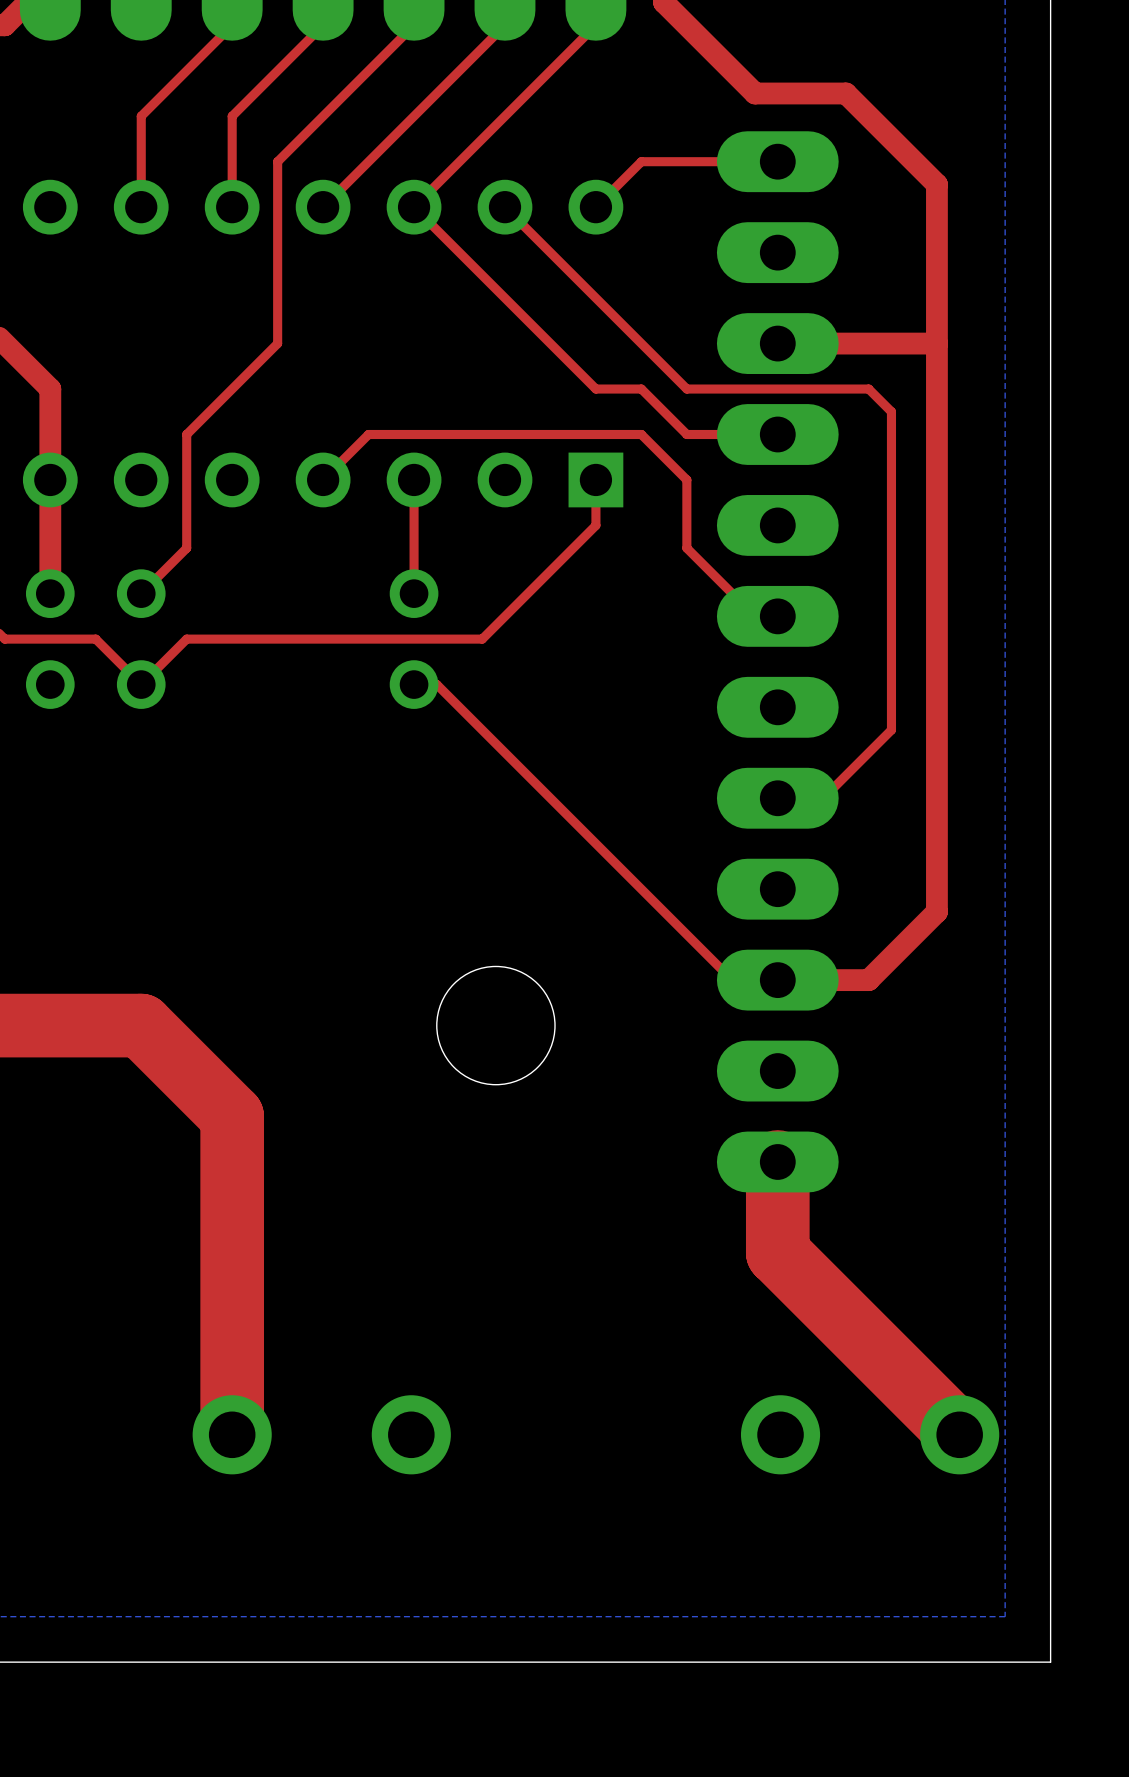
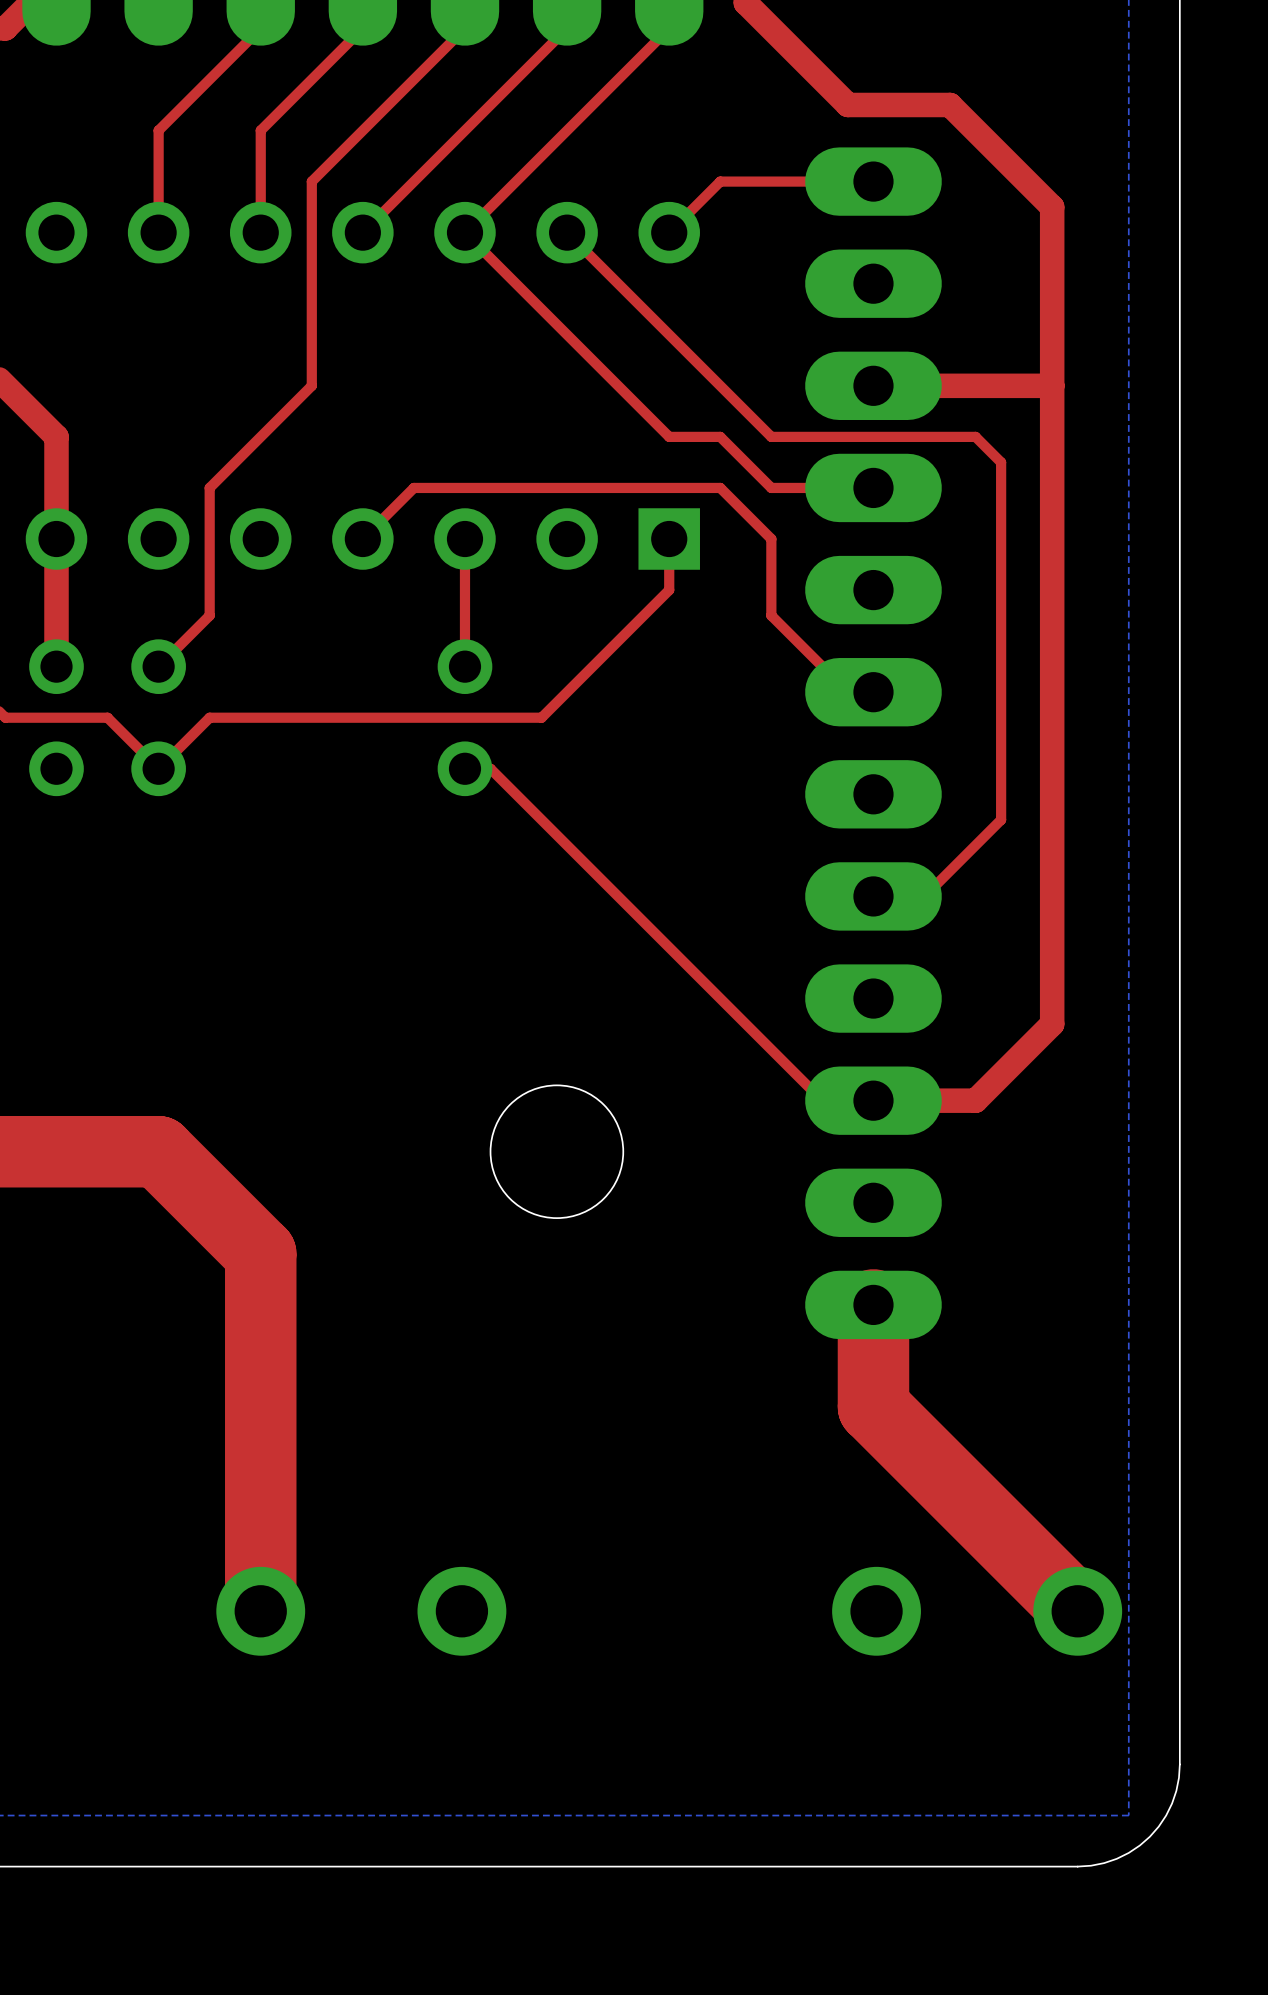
board edge: (1050, 1571) (1050, 1662) (959, 1662) -> (1179, 1764) (1176, 1790) (1172, 1803) (1158, 1826) (1149, 1836) (1139, 1845) (1116, 1858) (1104, 1863) (1077, 1866)

